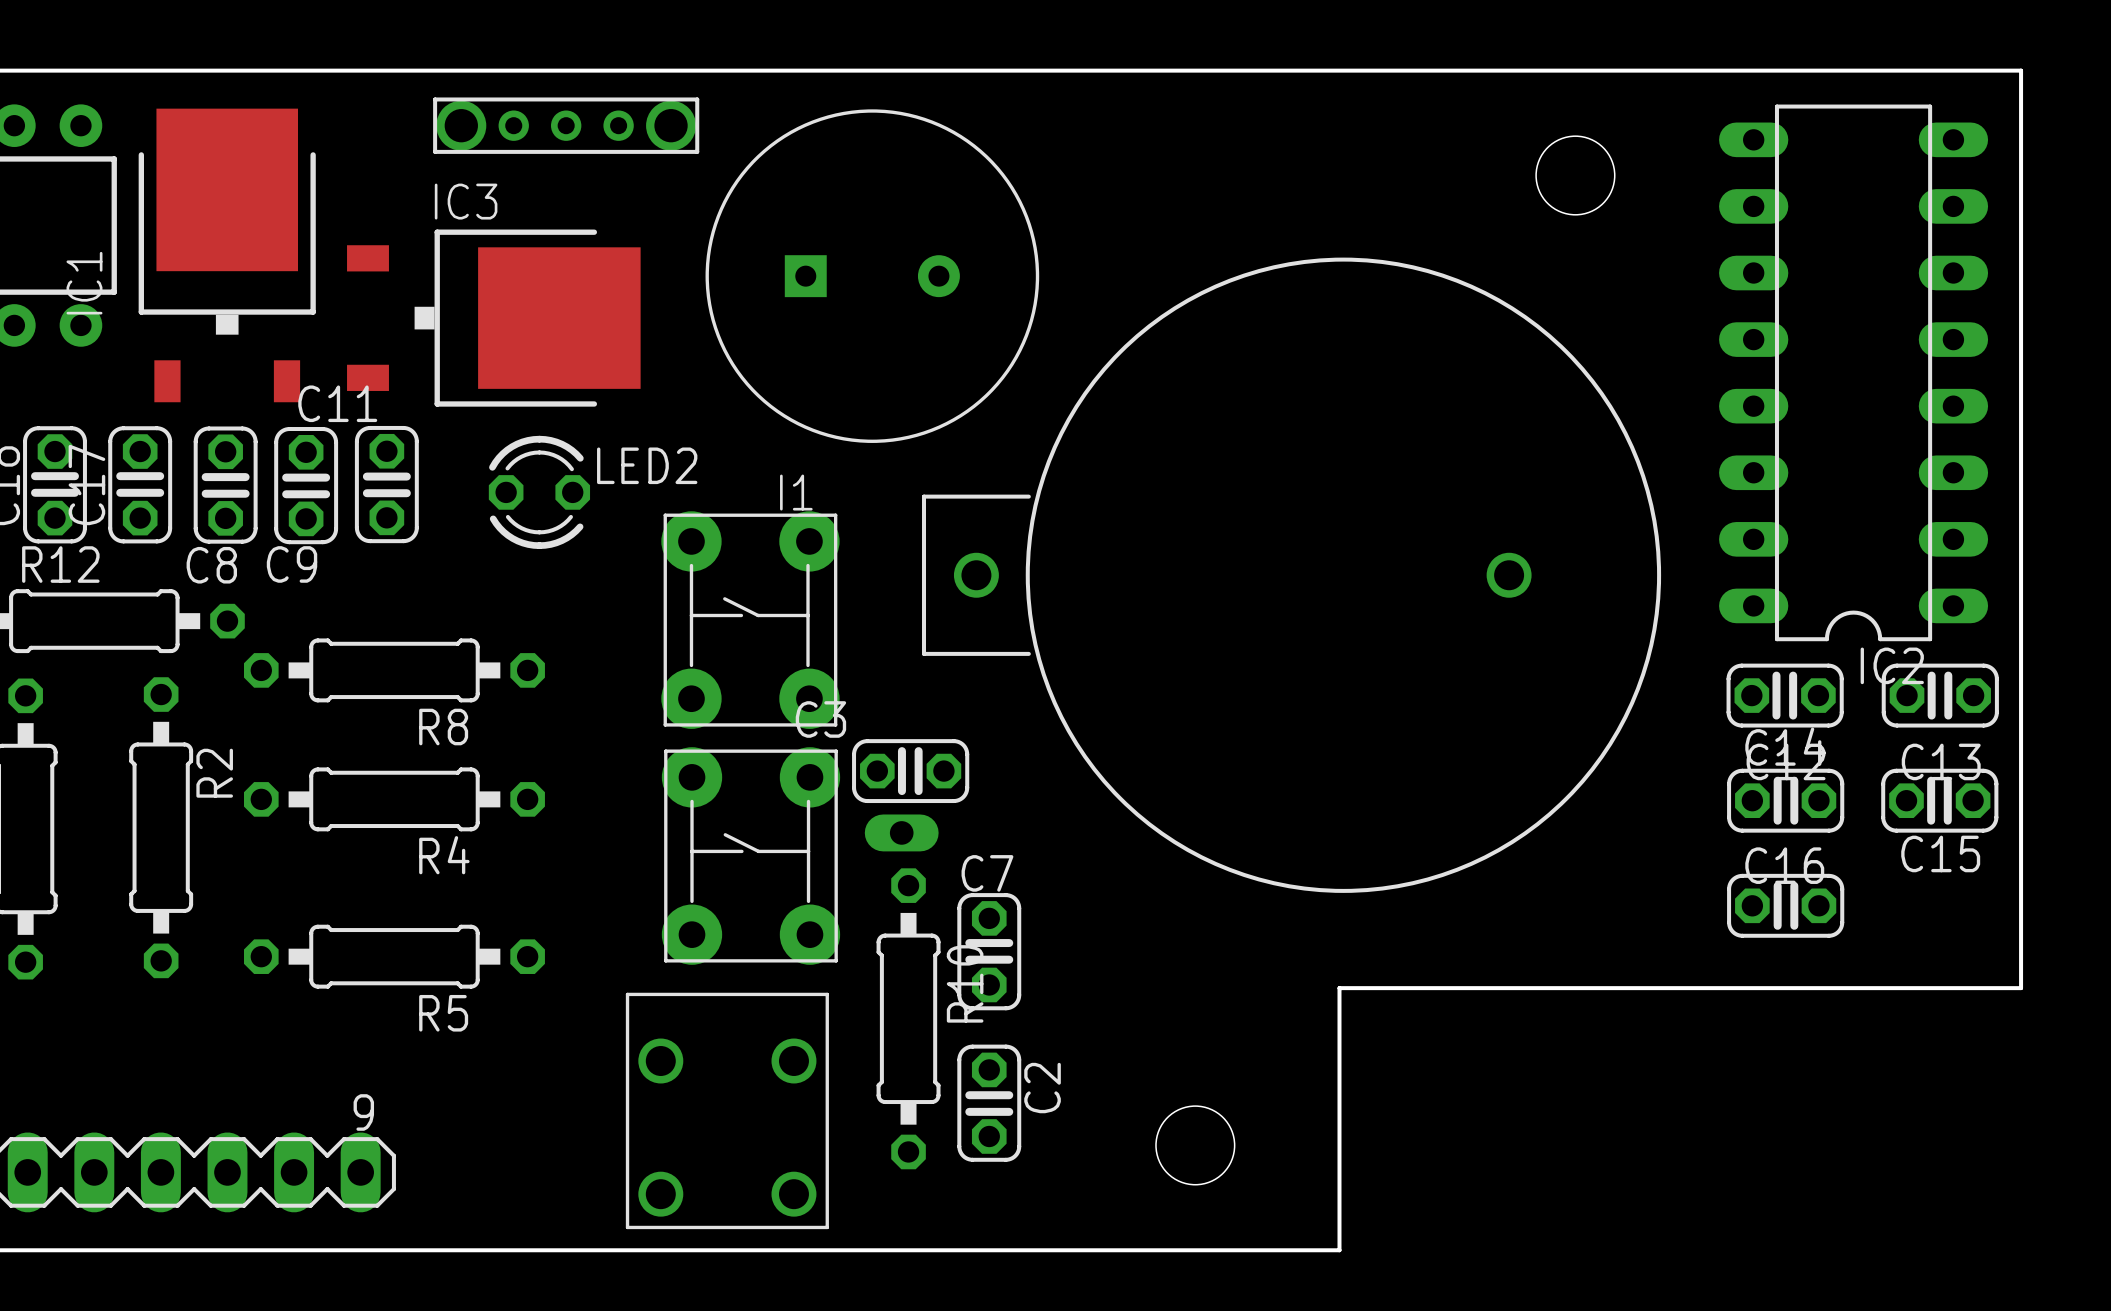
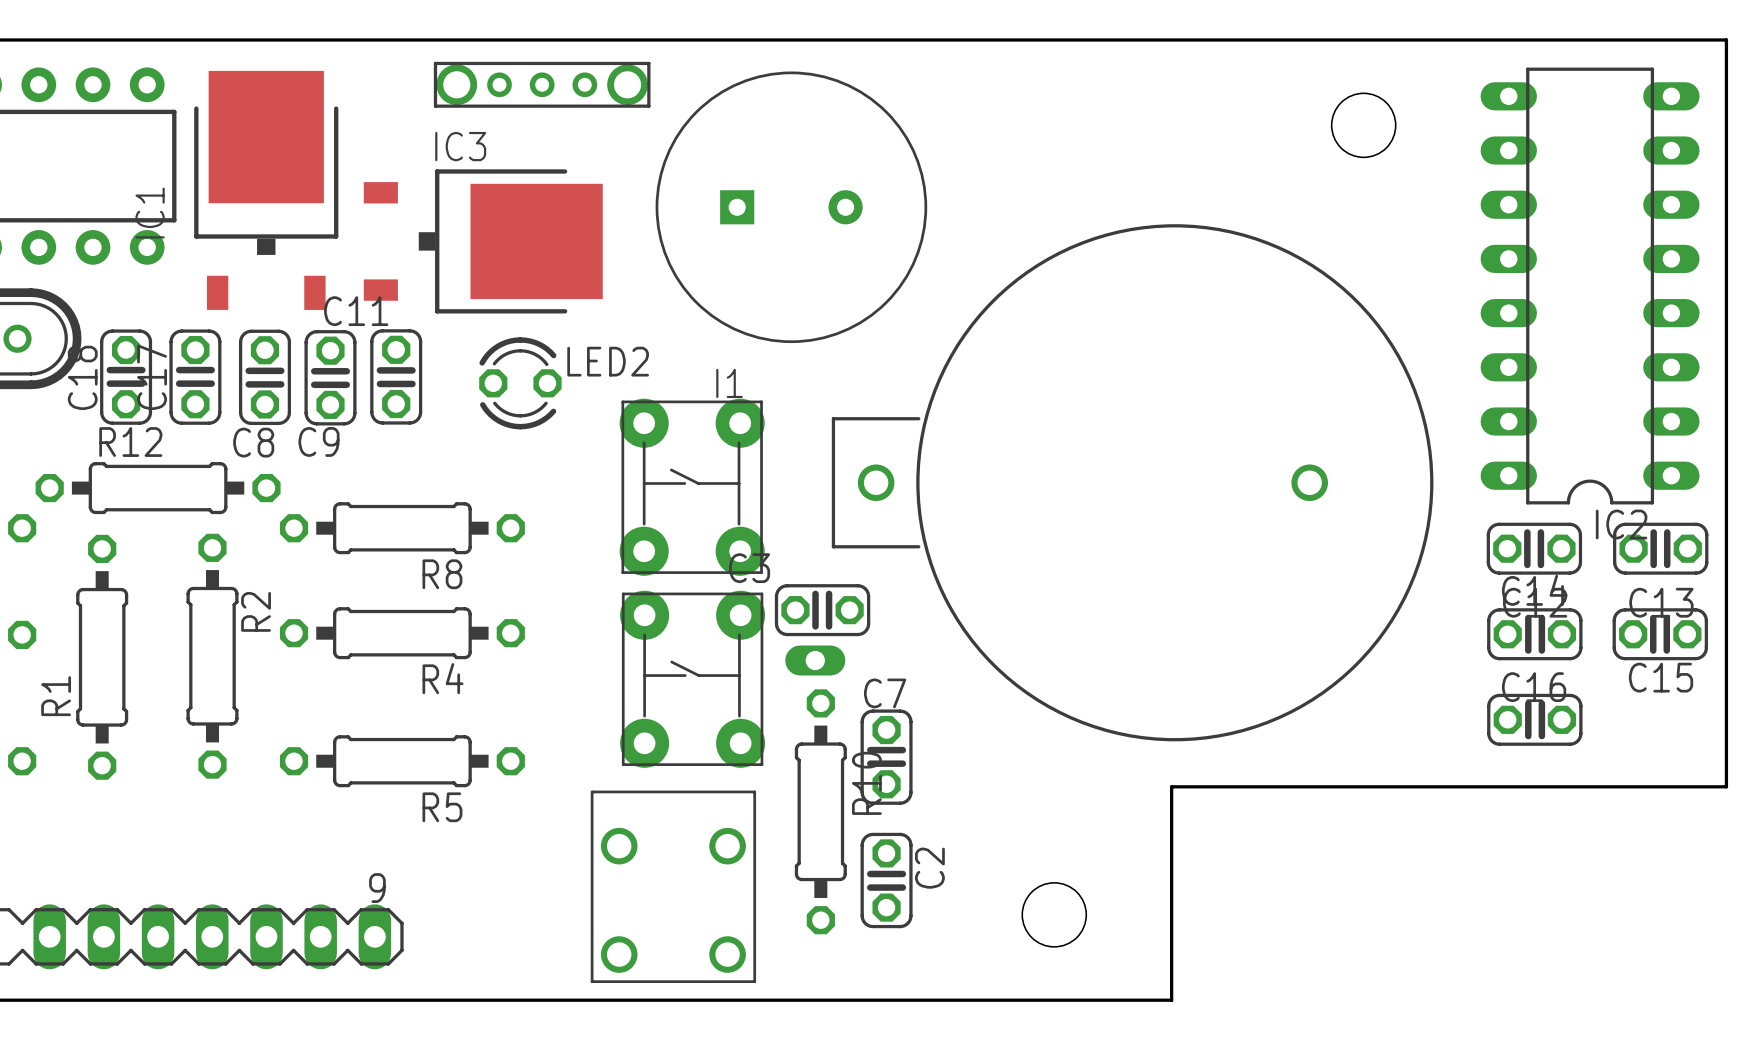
part position: (1291, 575) -> (1132, 482)

